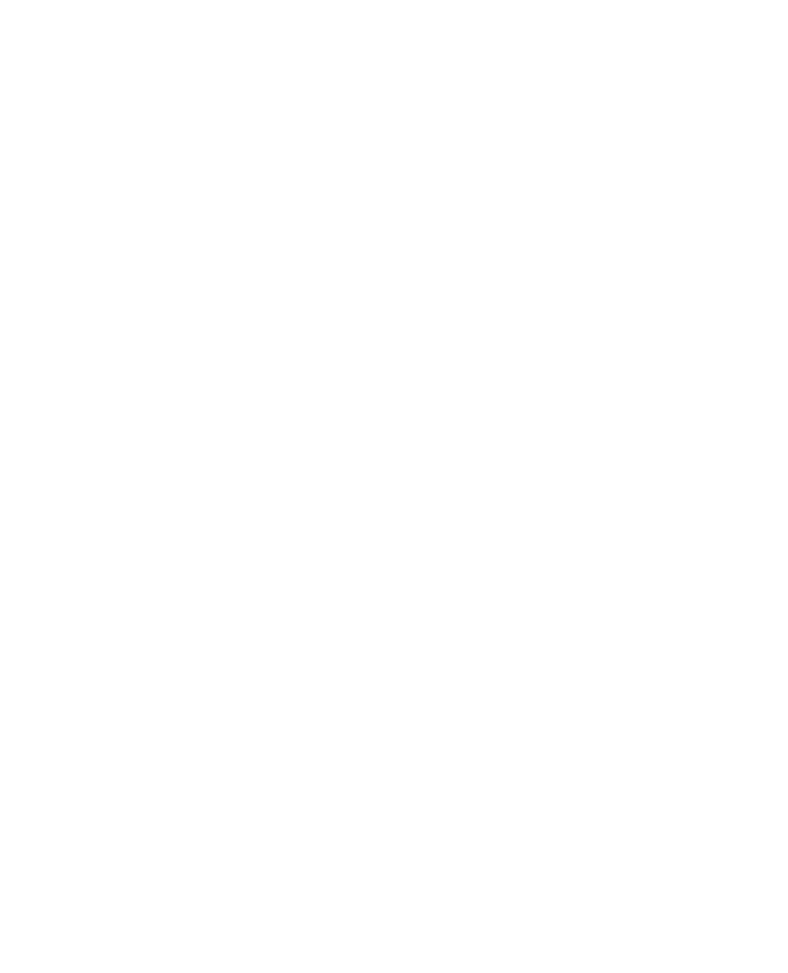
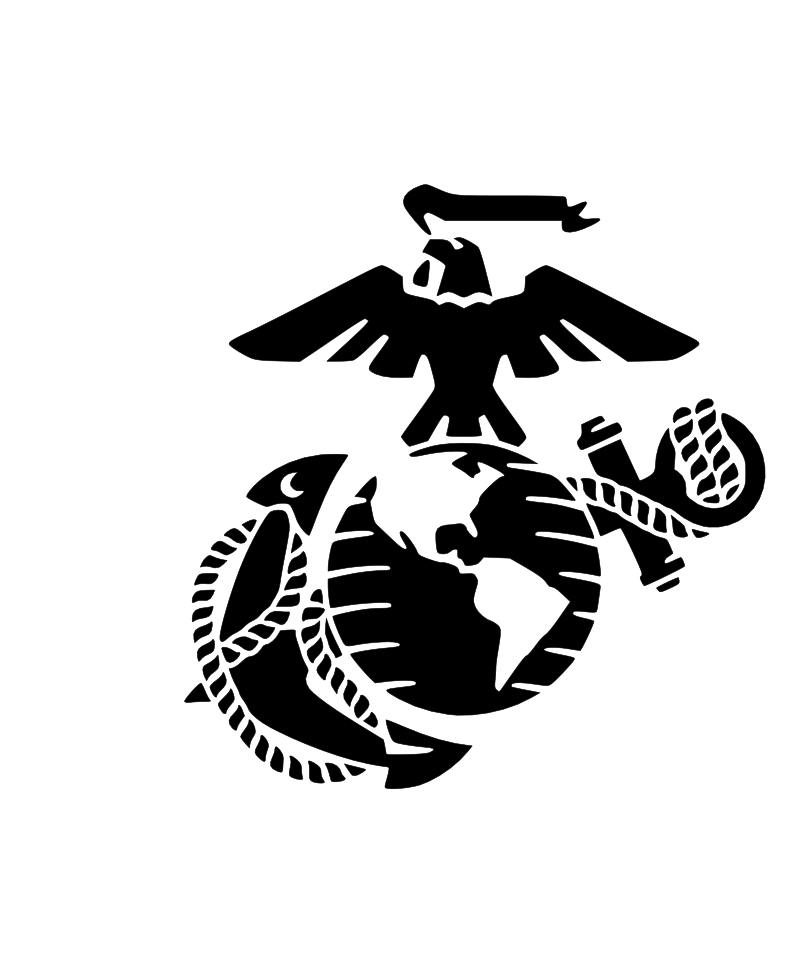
drawing: none -> [184, 184, 766, 790]

